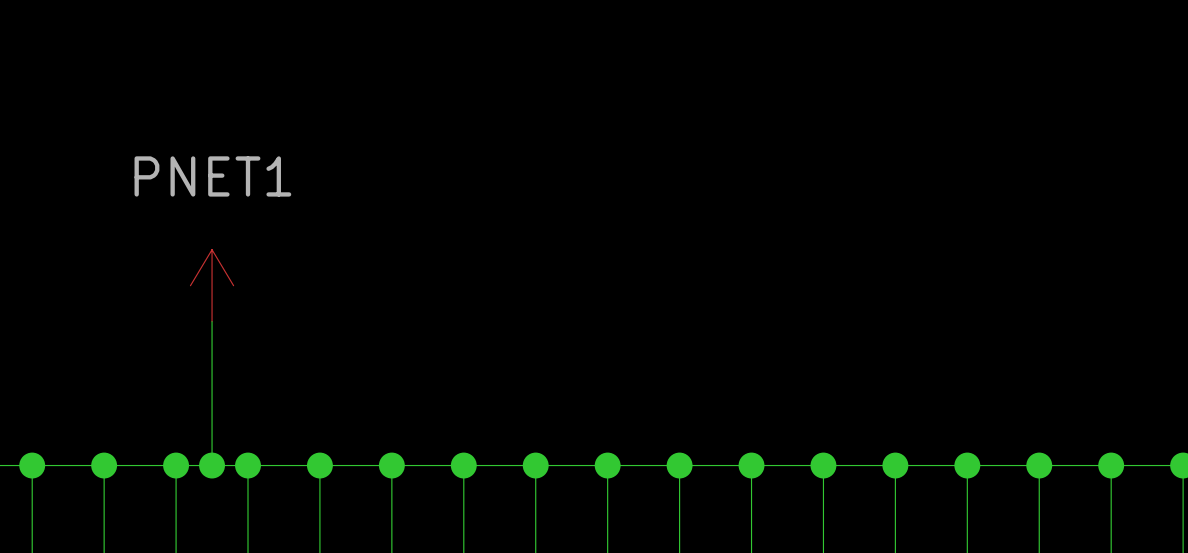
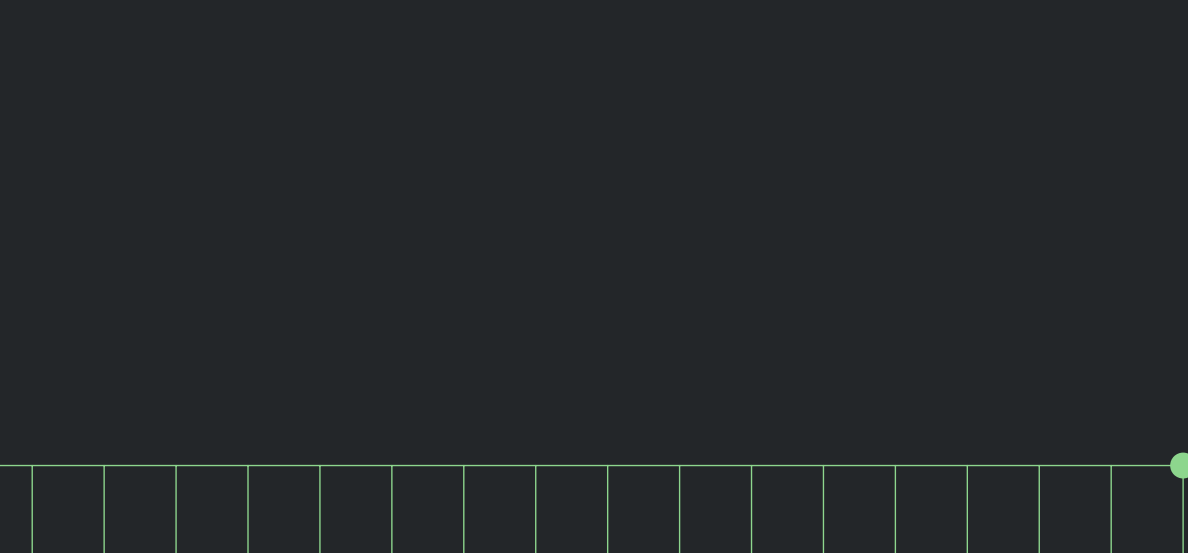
power symbol: PNET1 (212, 285) -> none
wire: (212, 321) (212, 465) -> none
junction: (32, 465) -> none
junction: (104, 465) -> none
junction: (176, 465) -> none
junction: (212, 465) -> none
junction: (248, 465) -> none
junction: (319, 465) -> none
junction: (391, 465) -> none
junction: (463, 465) -> none
junction: (535, 465) -> none
junction: (607, 465) -> none
junction: (679, 465) -> none
junction: (751, 465) -> none
junction: (823, 465) -> none
junction: (895, 465) -> none
junction: (967, 465) -> none
junction: (1039, 465) -> none
junction: (1111, 465) -> none

